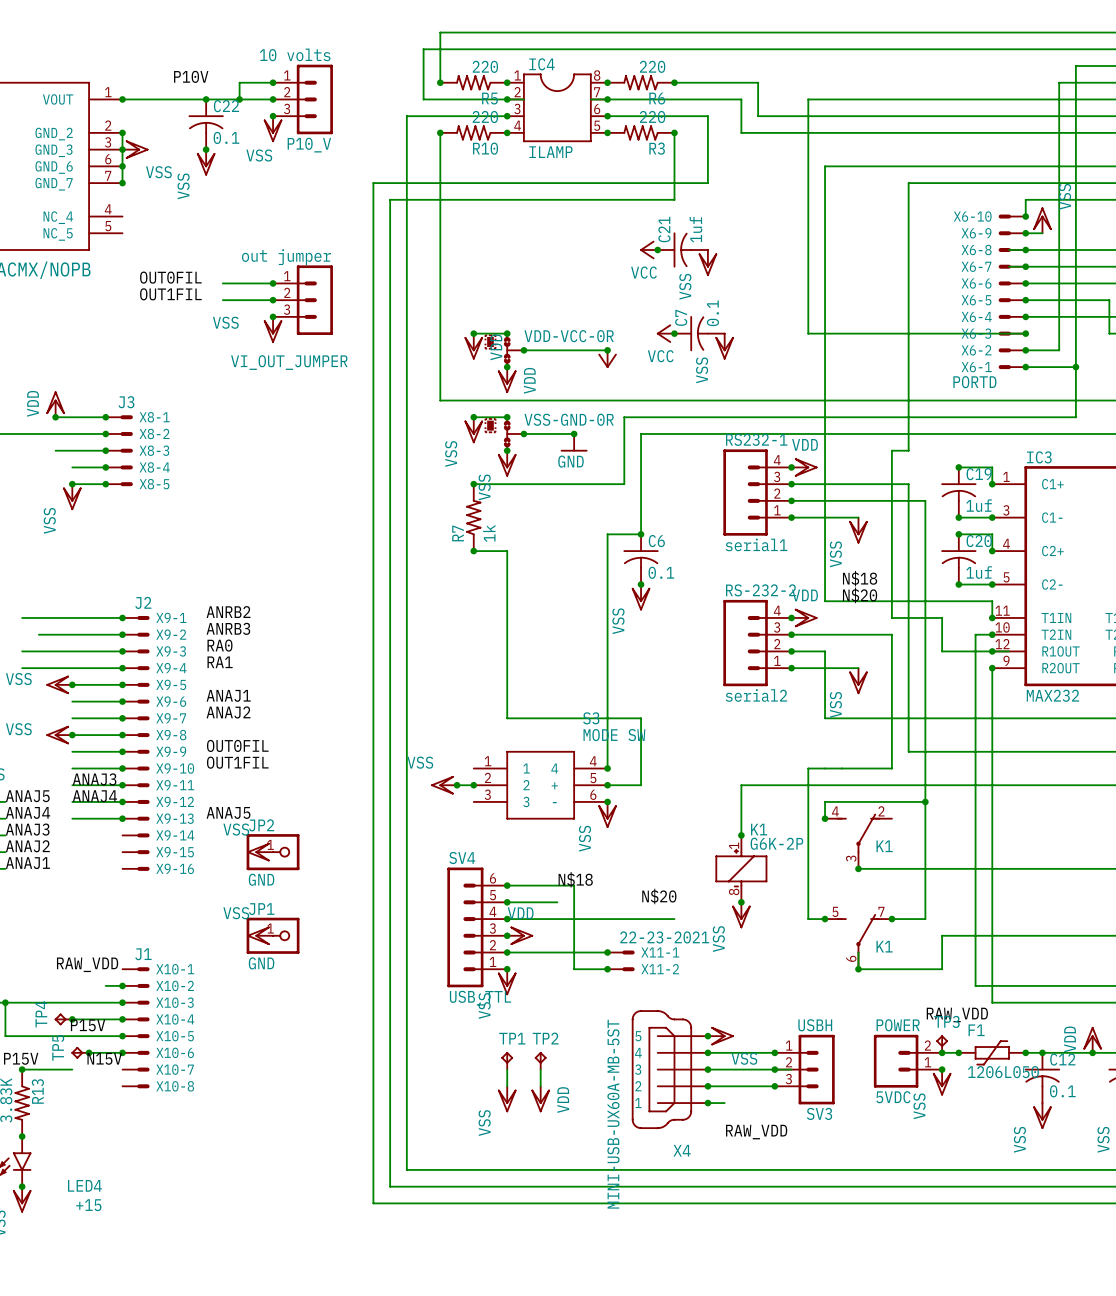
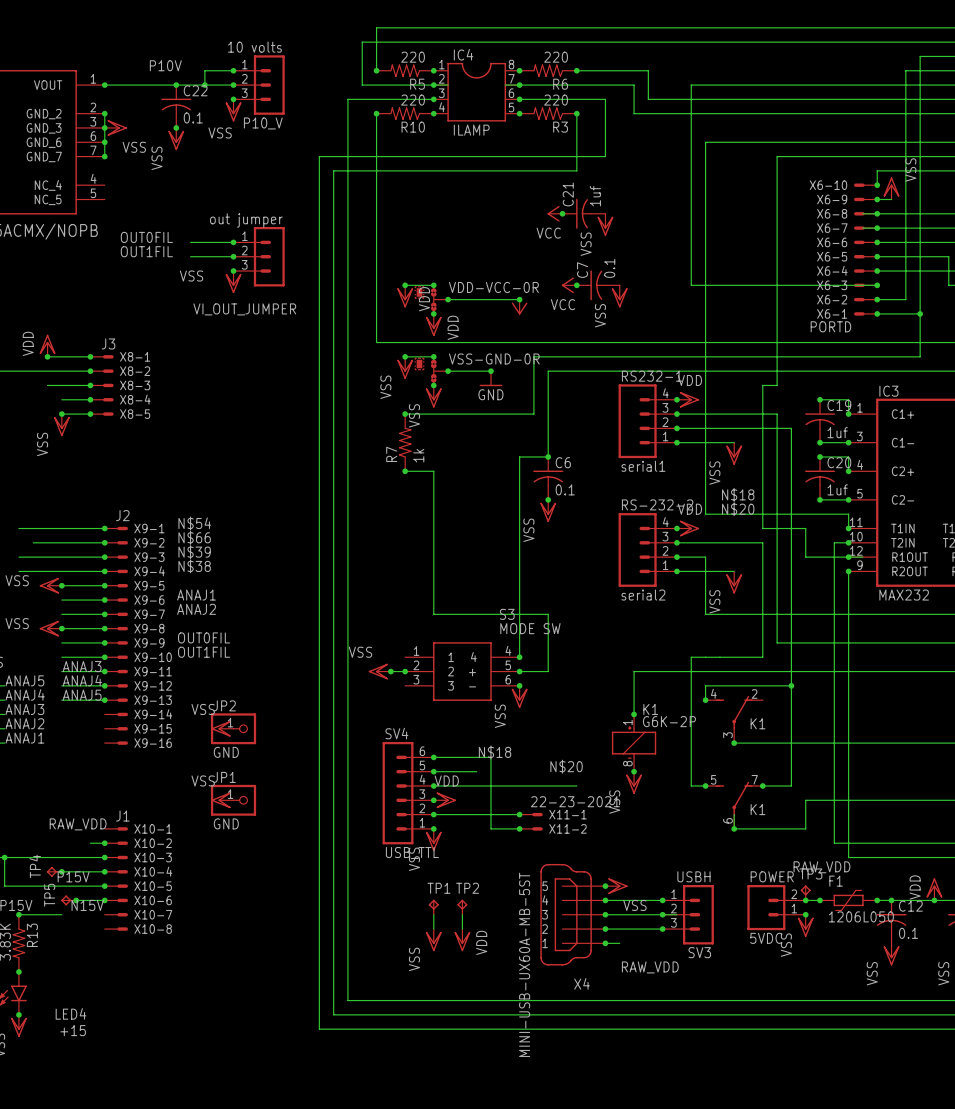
label: ANRB2 (228, 612) -> N$54 (194, 523)
label: ANRB3 (228, 628) -> N$66 (194, 537)
label: RA0 (219, 645) -> N$39 (194, 552)
label: RA1 (220, 662) -> N$38 (194, 566)
label position: ANAJ5 (228, 812) -> ANAJ5 (82, 695)

